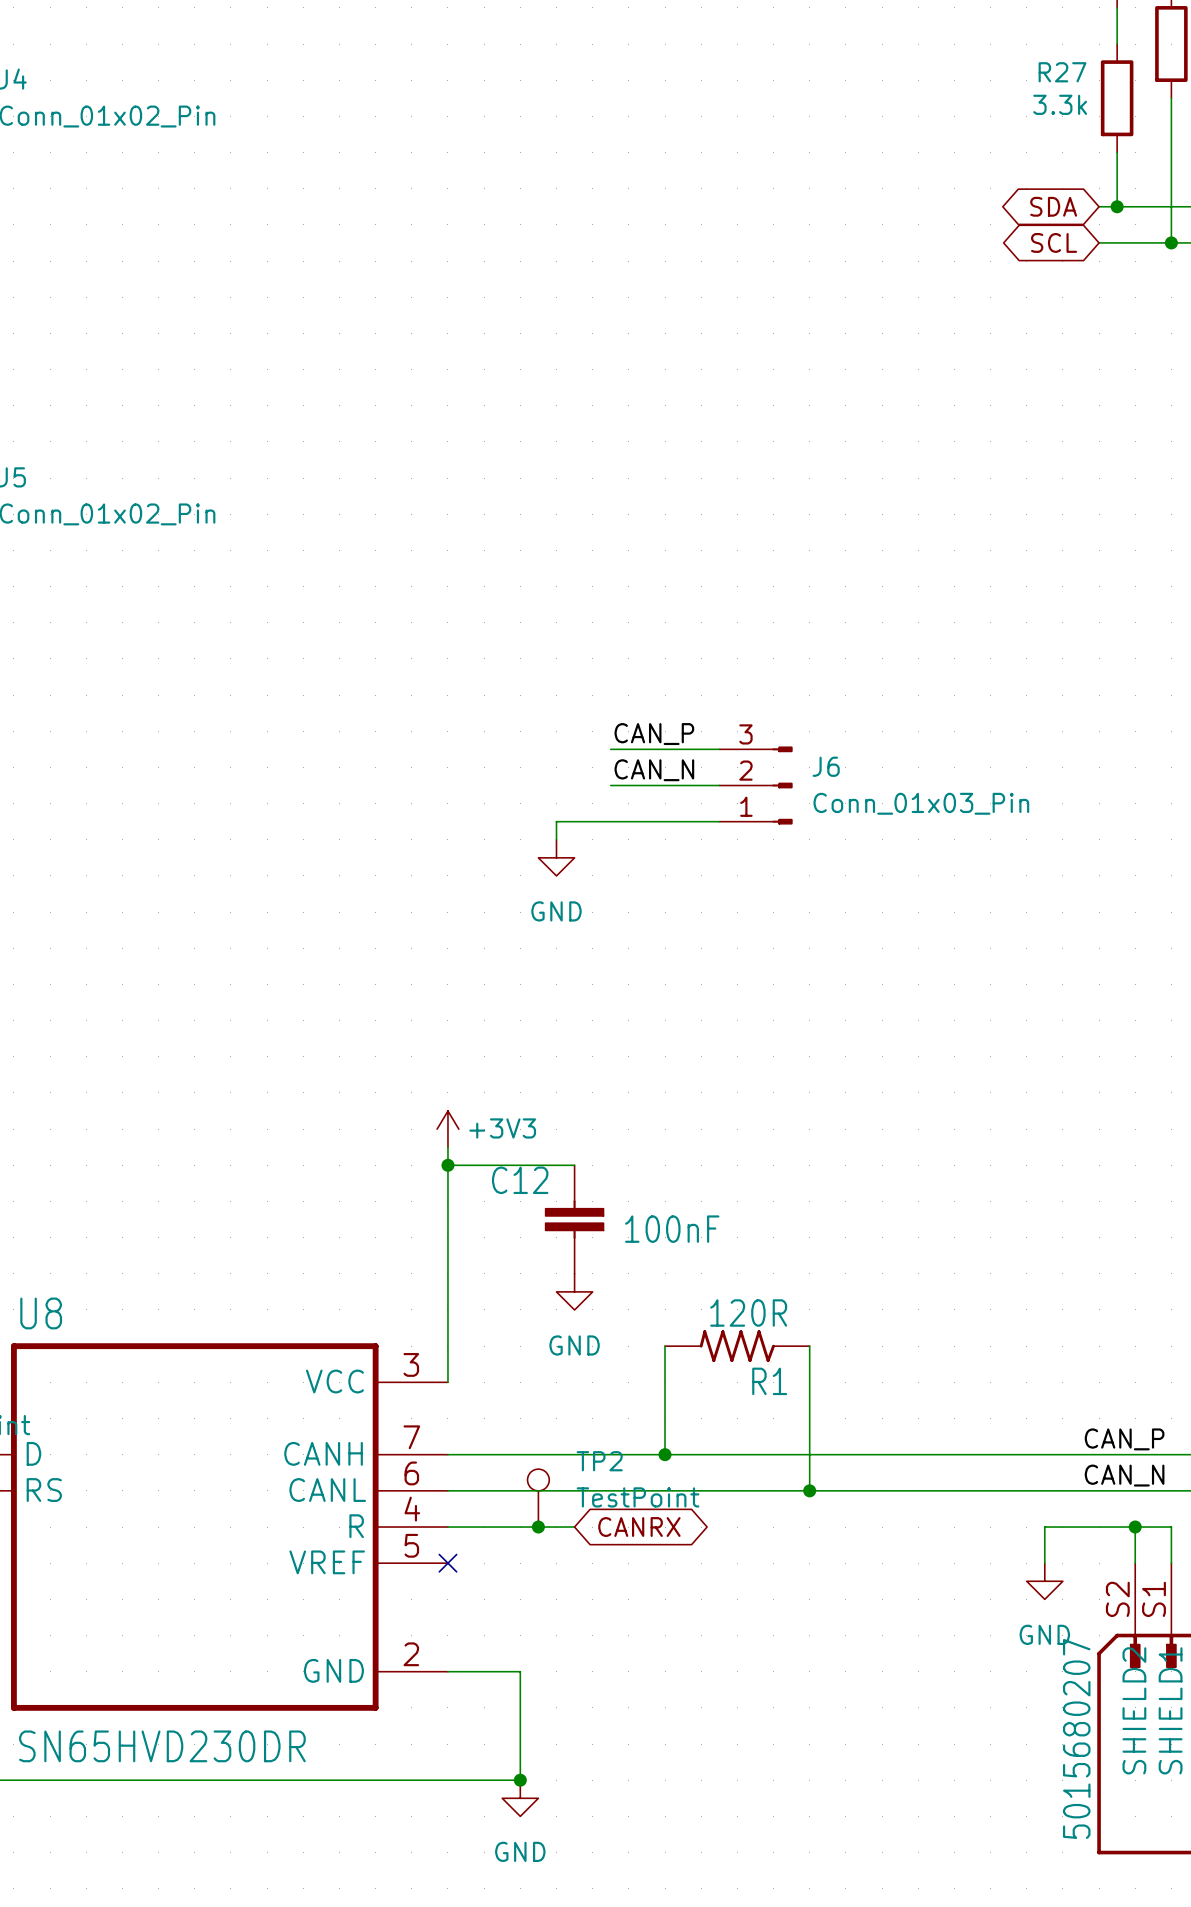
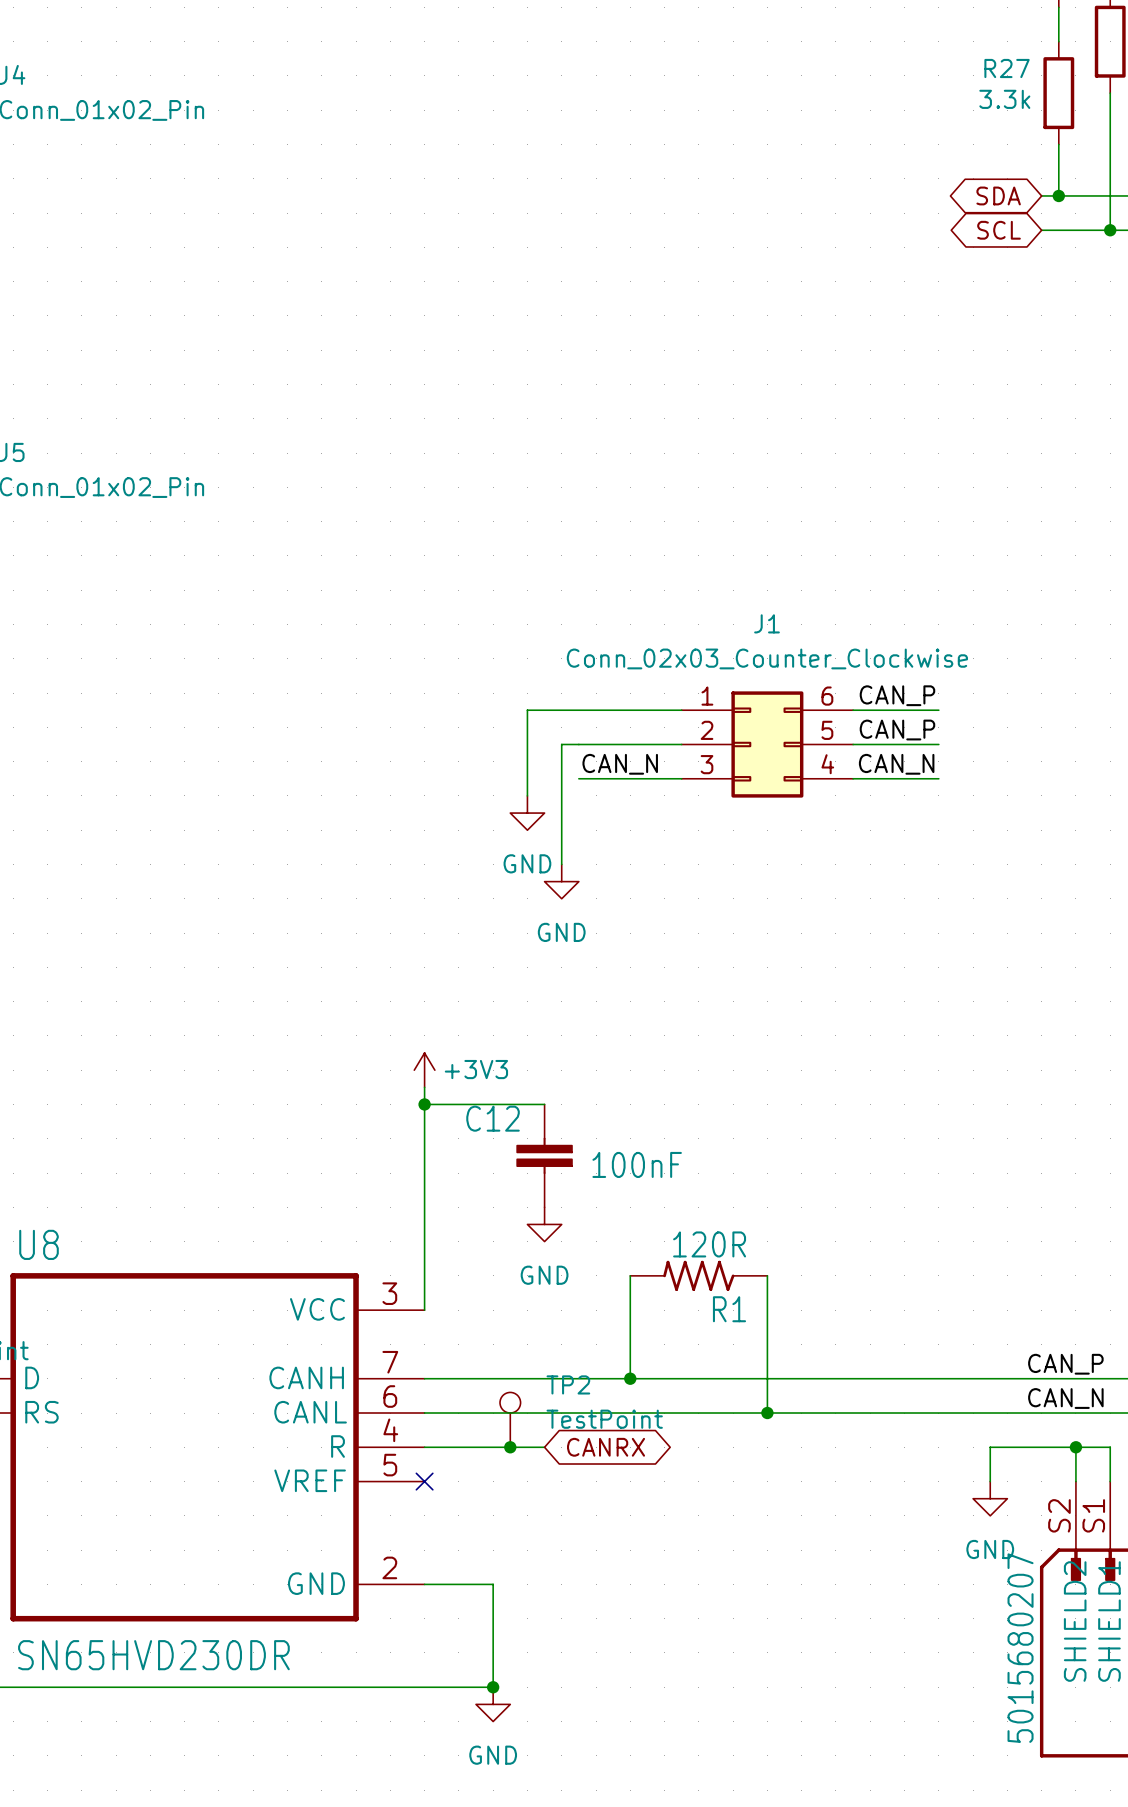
label: CAN_P (654, 734) -> none
label: none -> CAN_P (897, 695)
wire: none -> (853, 710) (938, 710)
label position: CAN_N (654, 770) -> CAN_N (620, 764)
label: none -> CAN_P (897, 730)
wire: none -> (578, 744) (561, 744) (561, 864)
J6: Conn_01x03_Pin (755, 785) -> none
J1: none -> Conn_02x03_Counter_Clockwise (767, 744)
wire: none -> (853, 744) (938, 744)
label: none -> CAN_N (896, 764)
wire: (556, 821) (610, 821) -> (527, 778) (527, 710) (578, 710)
wire: none -> (853, 778) (938, 778)
power symbol: none -> GND (561, 881)

